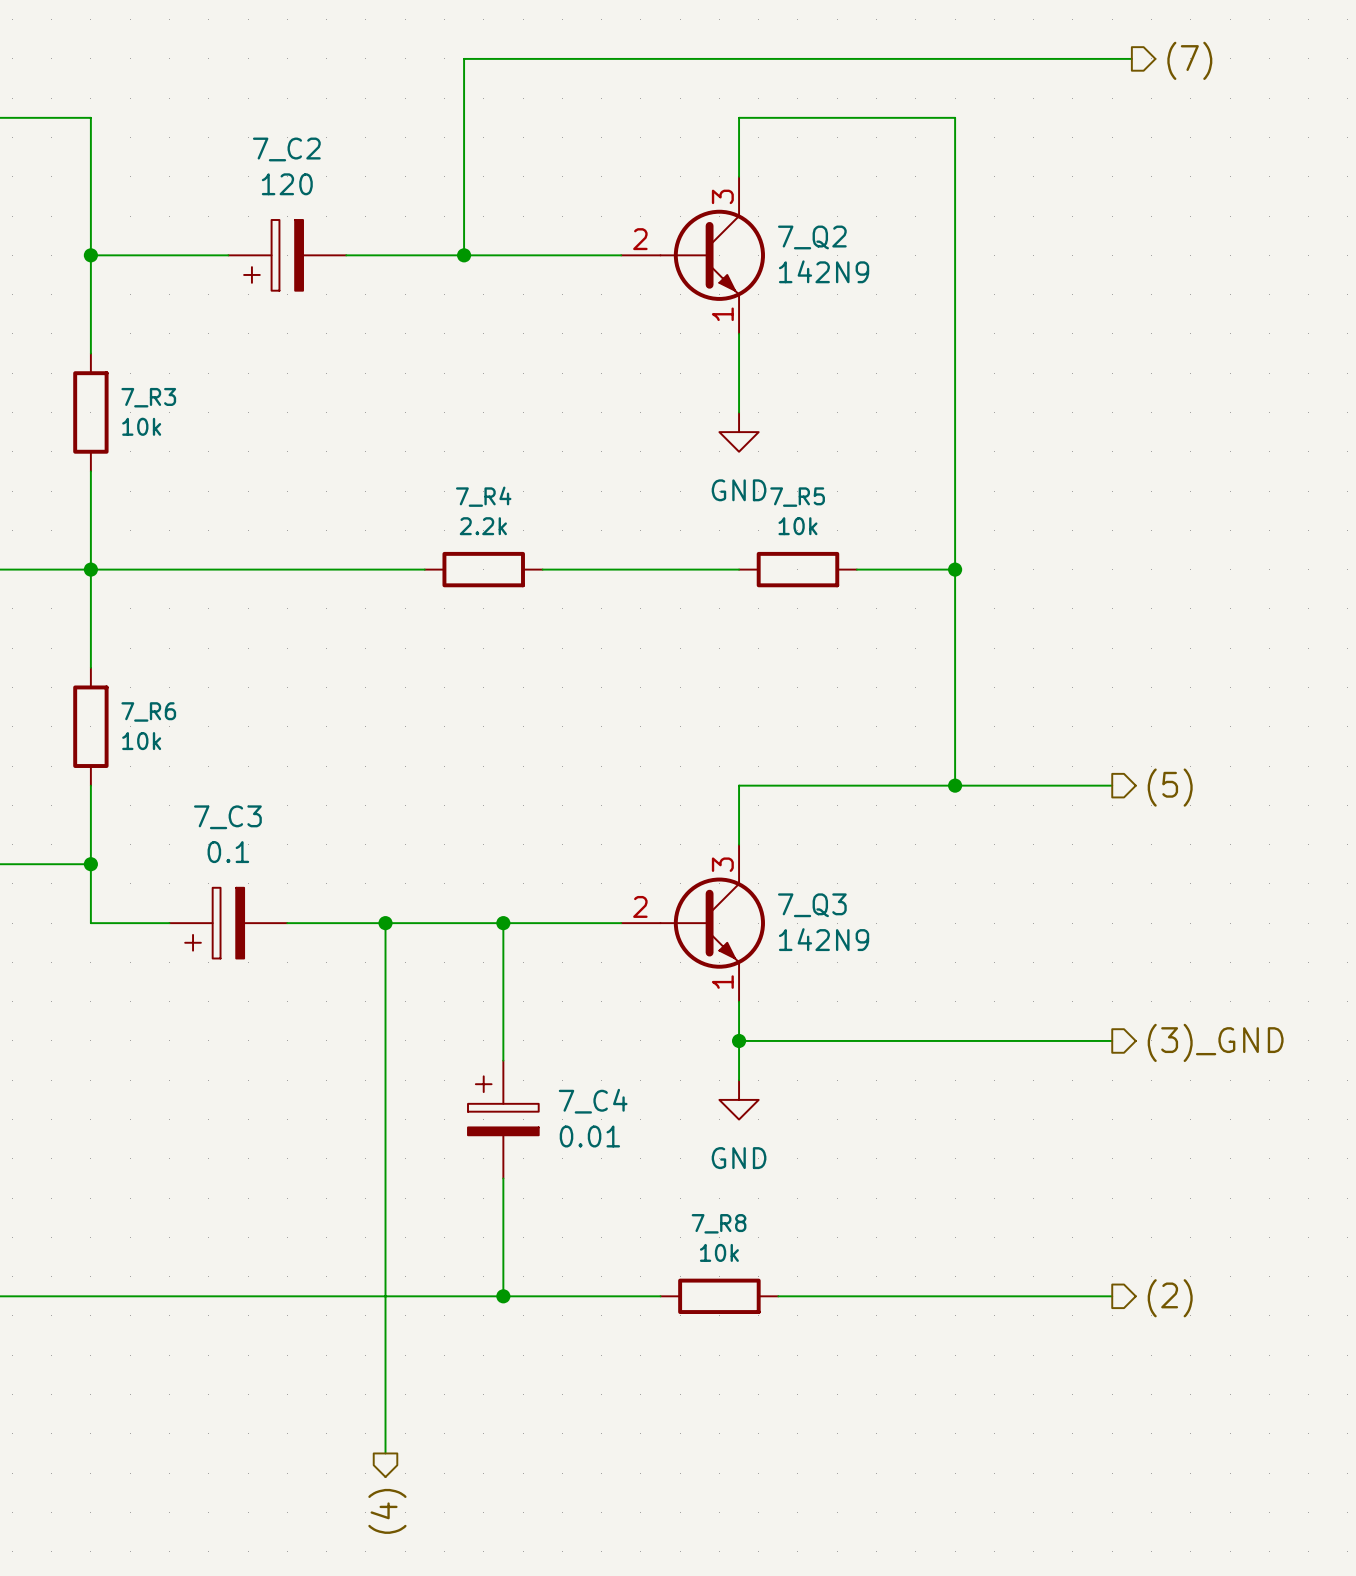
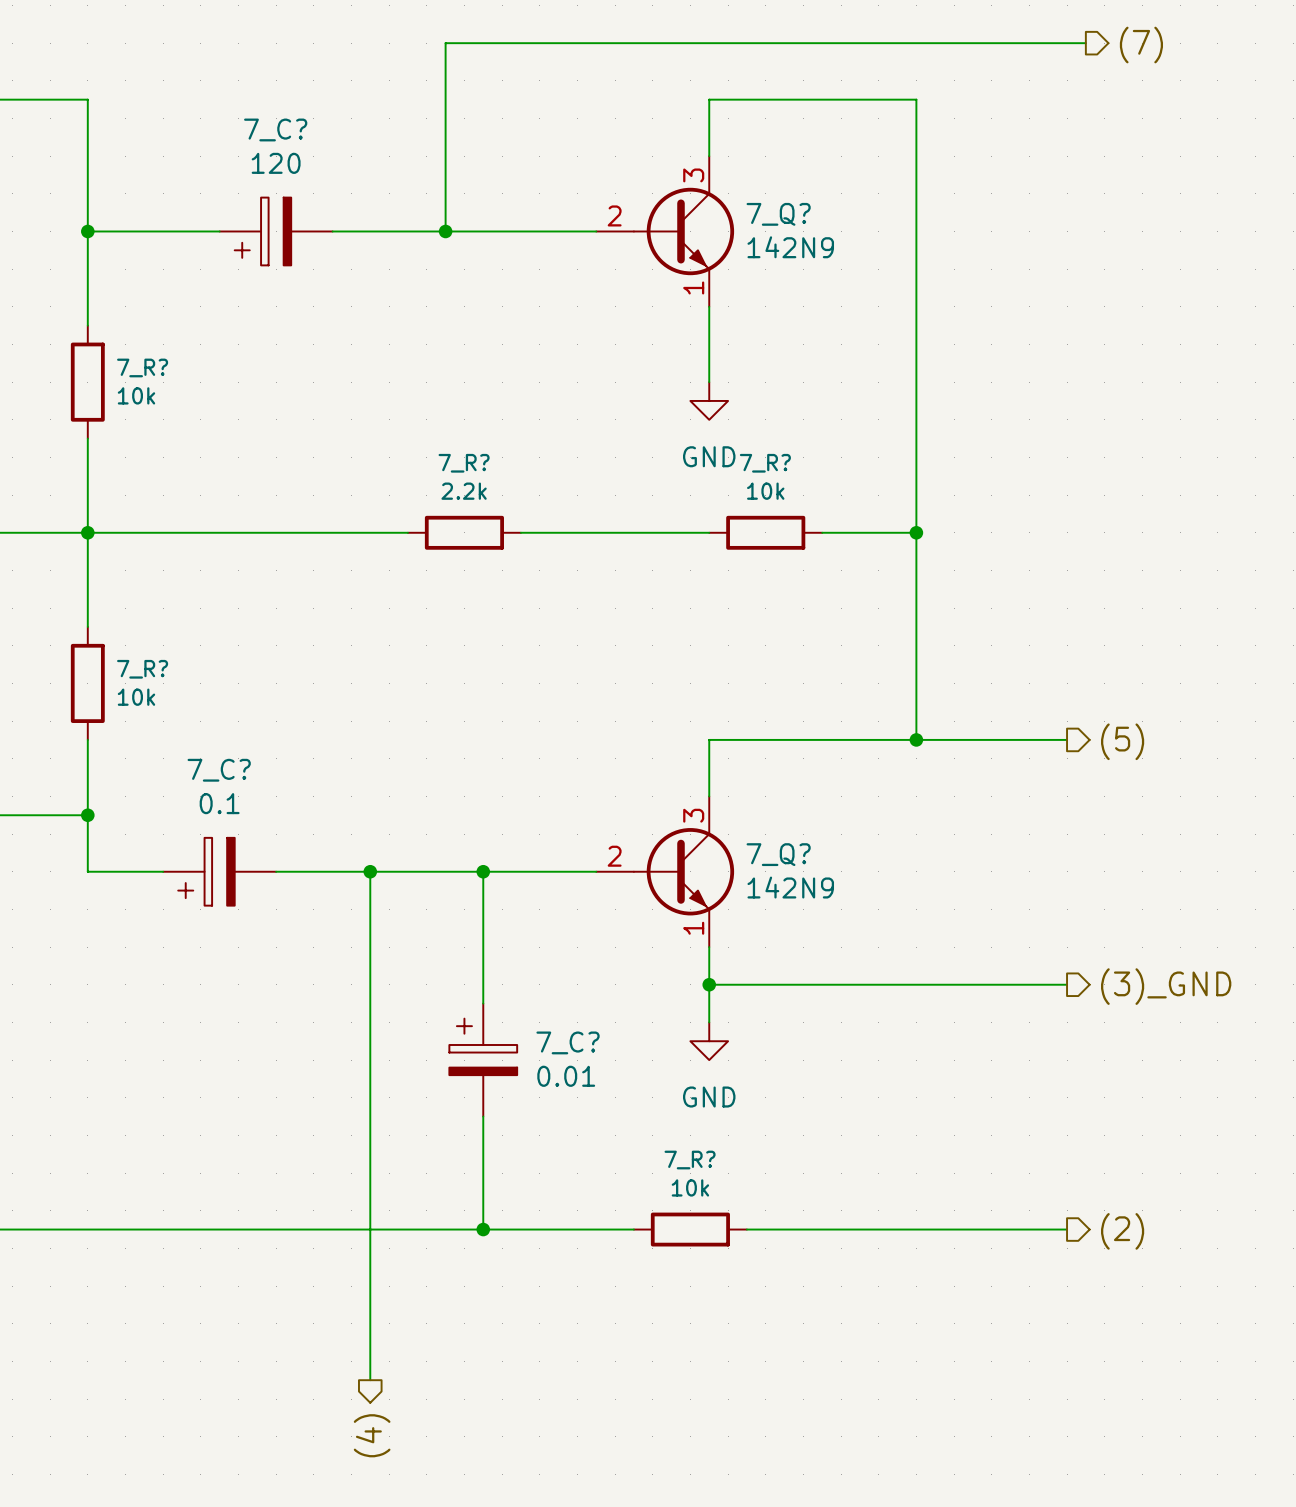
7_C2 name: 7_C2 (286, 149) -> 7_C? (275, 129)
7_Q2 name: 7_Q2 (812, 237) -> 7_Q? (778, 214)
7_R3 name: 7_R3 (148, 397) -> 7_R? (142, 367)
7_R4 name: 7_R4 (483, 496) -> 7_R? (464, 463)
7_R5 name: 7_R5 (797, 497) -> 7_R? (765, 463)
7_R6 name: 7_R6 (148, 711) -> 7_R? (142, 669)
7_C3 name: 7_C3 (227, 817) -> 7_C? (219, 770)
7_Q3 name: 7_Q3 (812, 905) -> 7_Q? (778, 854)
7_C4 name: 7_C4 (593, 1101) -> 7_C? (568, 1042)
7_R8 name: 7_R8 (719, 1223) -> 7_R? (690, 1160)

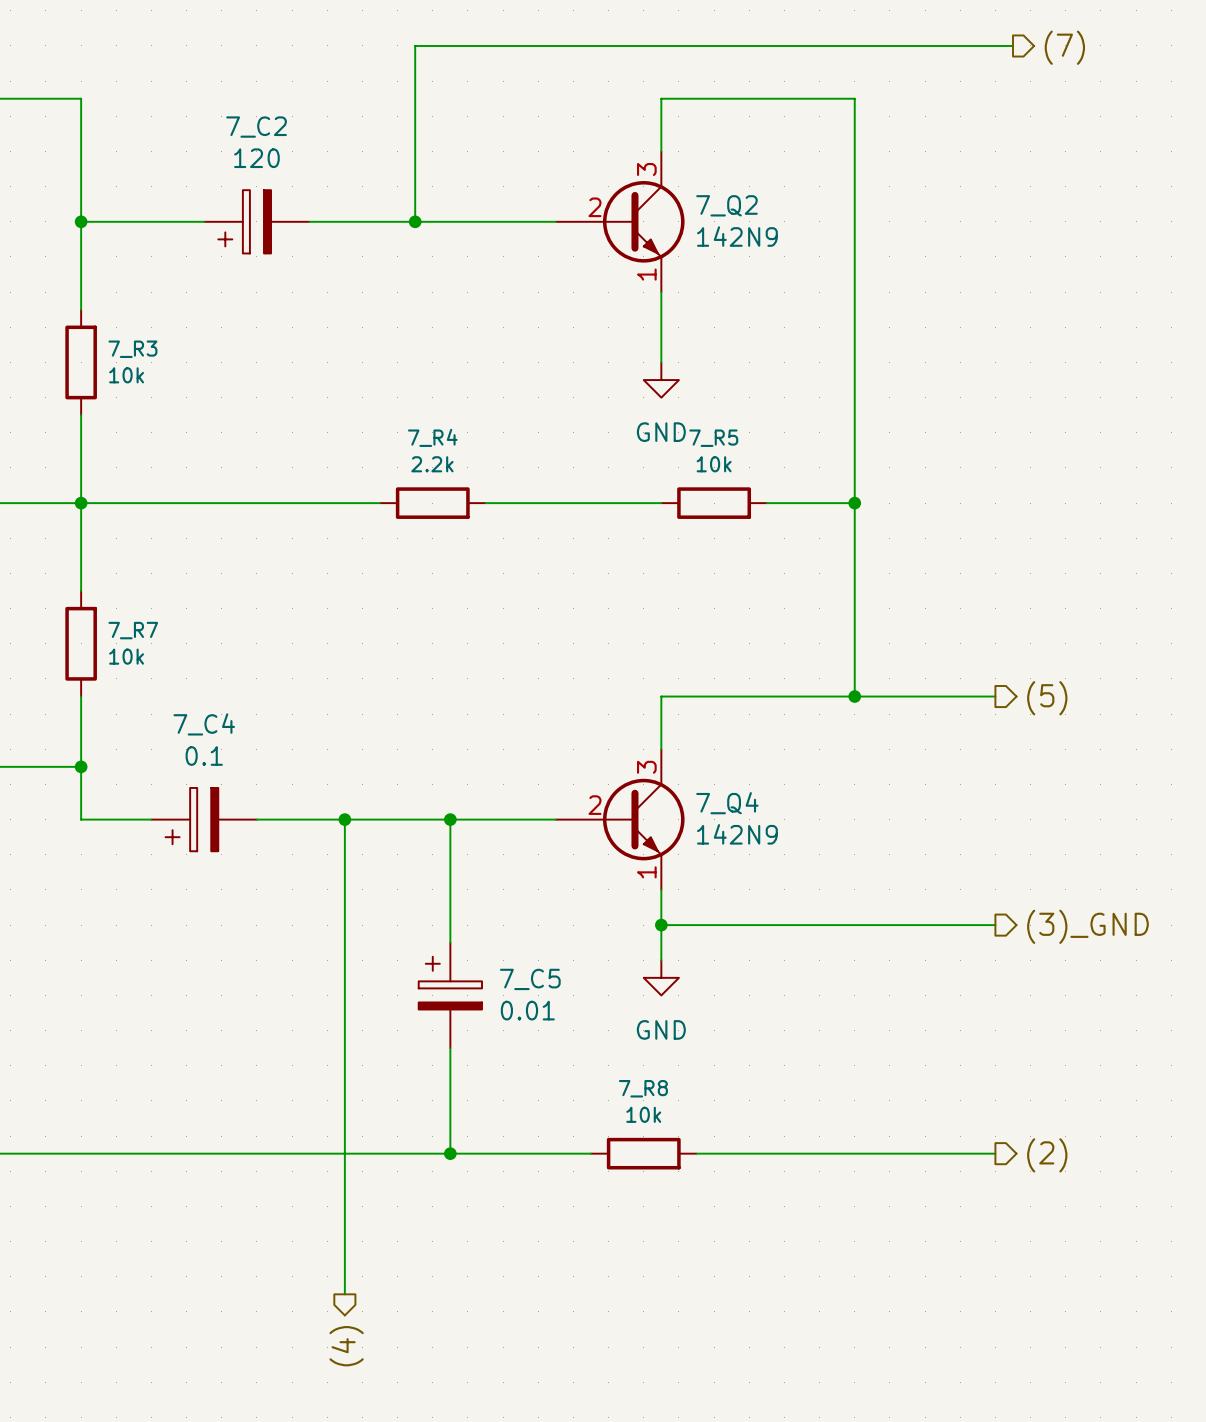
7_C? name: 7_C? (275, 129) -> 7_C2 (256, 127)
7_Q?: 142N9 (665, 231) -> none
7_Q2: none -> 142N9 (620, 221)
7_R? name: 7_R? (142, 367) -> 7_R3 (132, 349)
7_R? name: 7_R? (464, 463) -> 7_R4 (432, 437)
7_R? name: 7_R? (765, 463) -> 7_R5 (713, 438)
7_R? name: 7_R? (142, 669) -> 7_R7 (133, 630)
7_C? name: 7_C? (219, 770) -> 7_C4 (204, 724)
7_Q?: 142N9 (665, 871) -> none
7_Q4: none -> 142N9 (620, 819)
7_C? name: 7_C? (568, 1042) -> 7_C5 (530, 979)
7_R? name: 7_R? (690, 1160) -> 7_R8 (643, 1088)

